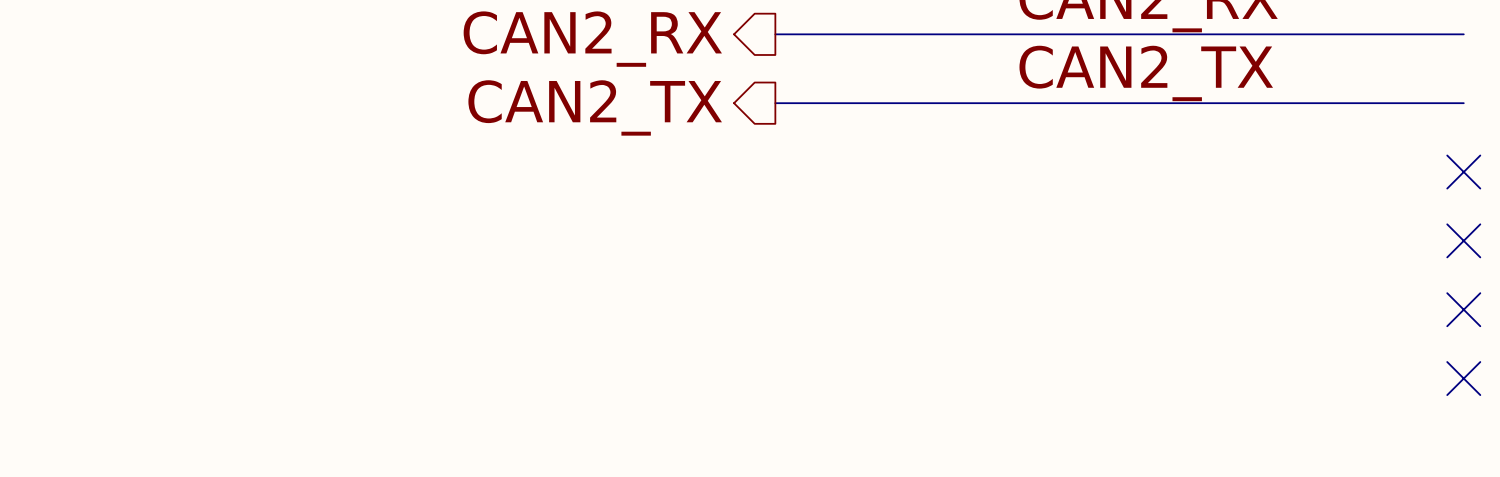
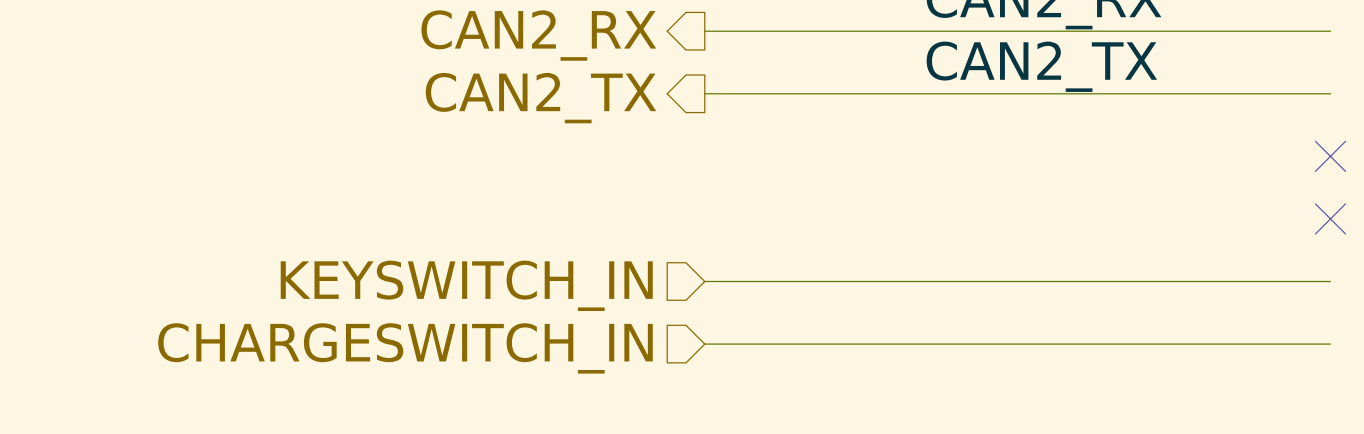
wire: none -> (704, 281) (1330, 281)
no-connect mark: (1463, 309) -> none
hierarchical label: none -> KEYSWITCH_IN (466, 285)
wire: none -> (704, 344) (1330, 344)
no-connect mark: (1463, 378) -> none
hierarchical label: none -> CHARGESWITCH_IN (405, 348)

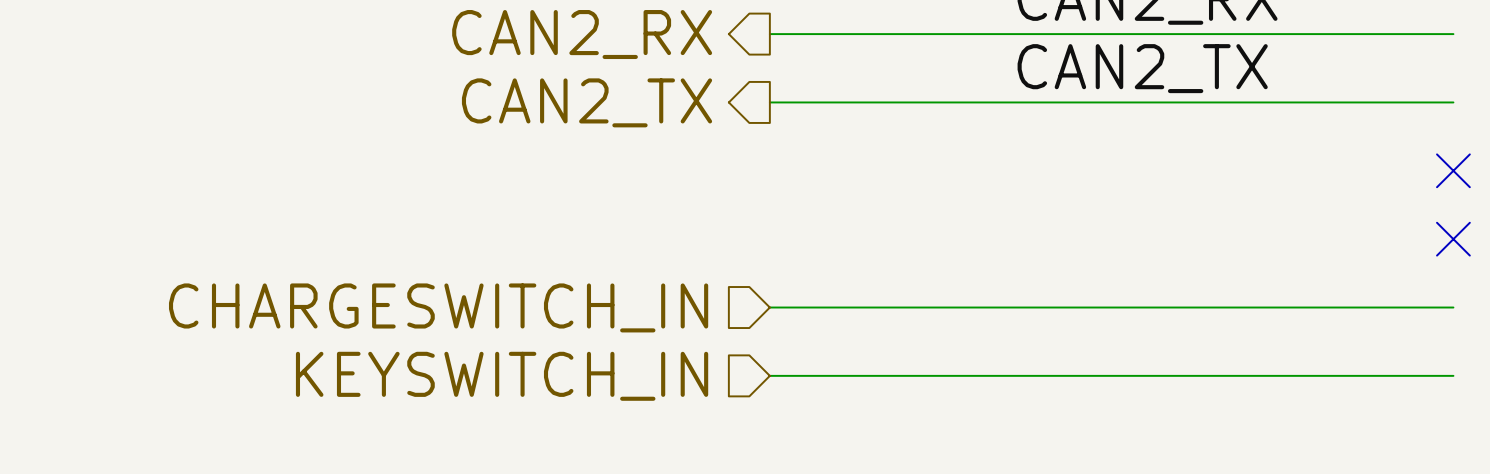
hierarchical label: KEYSWITCH_IN (466, 285) -> CHARGESWITCH_IN (438, 307)
hierarchical label: CHARGESWITCH_IN (405, 348) -> KEYSWITCH_IN (502, 376)

